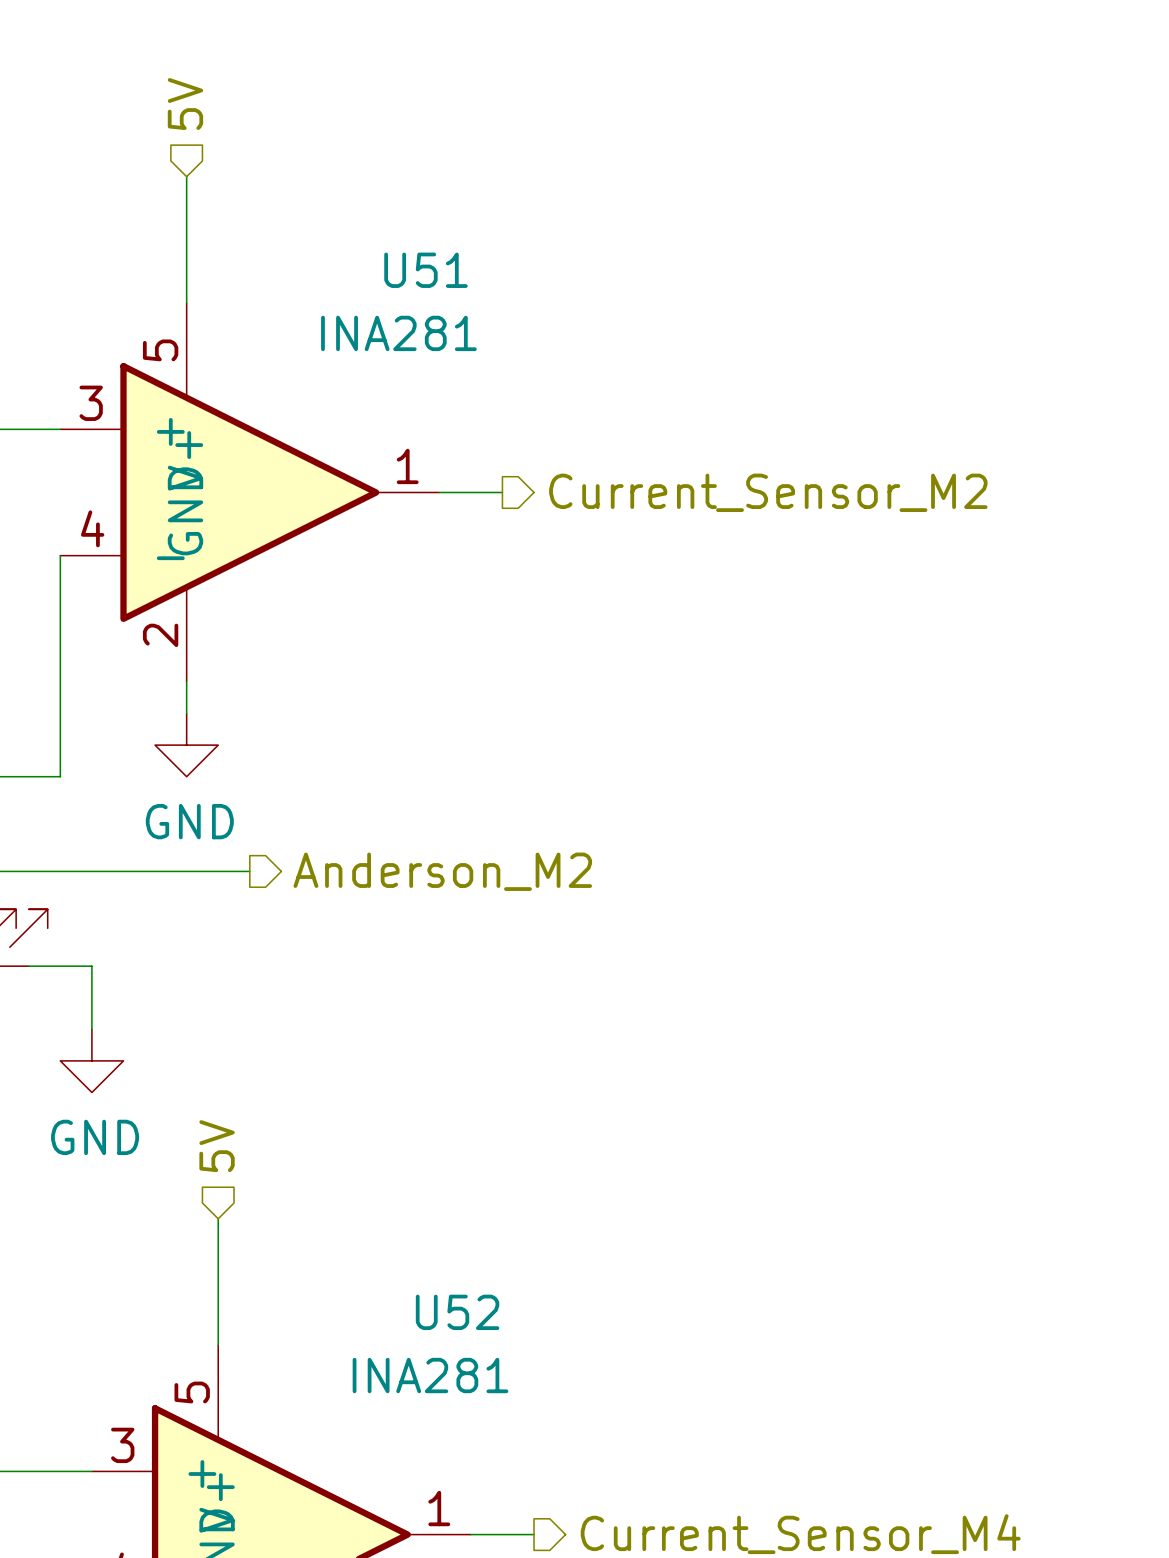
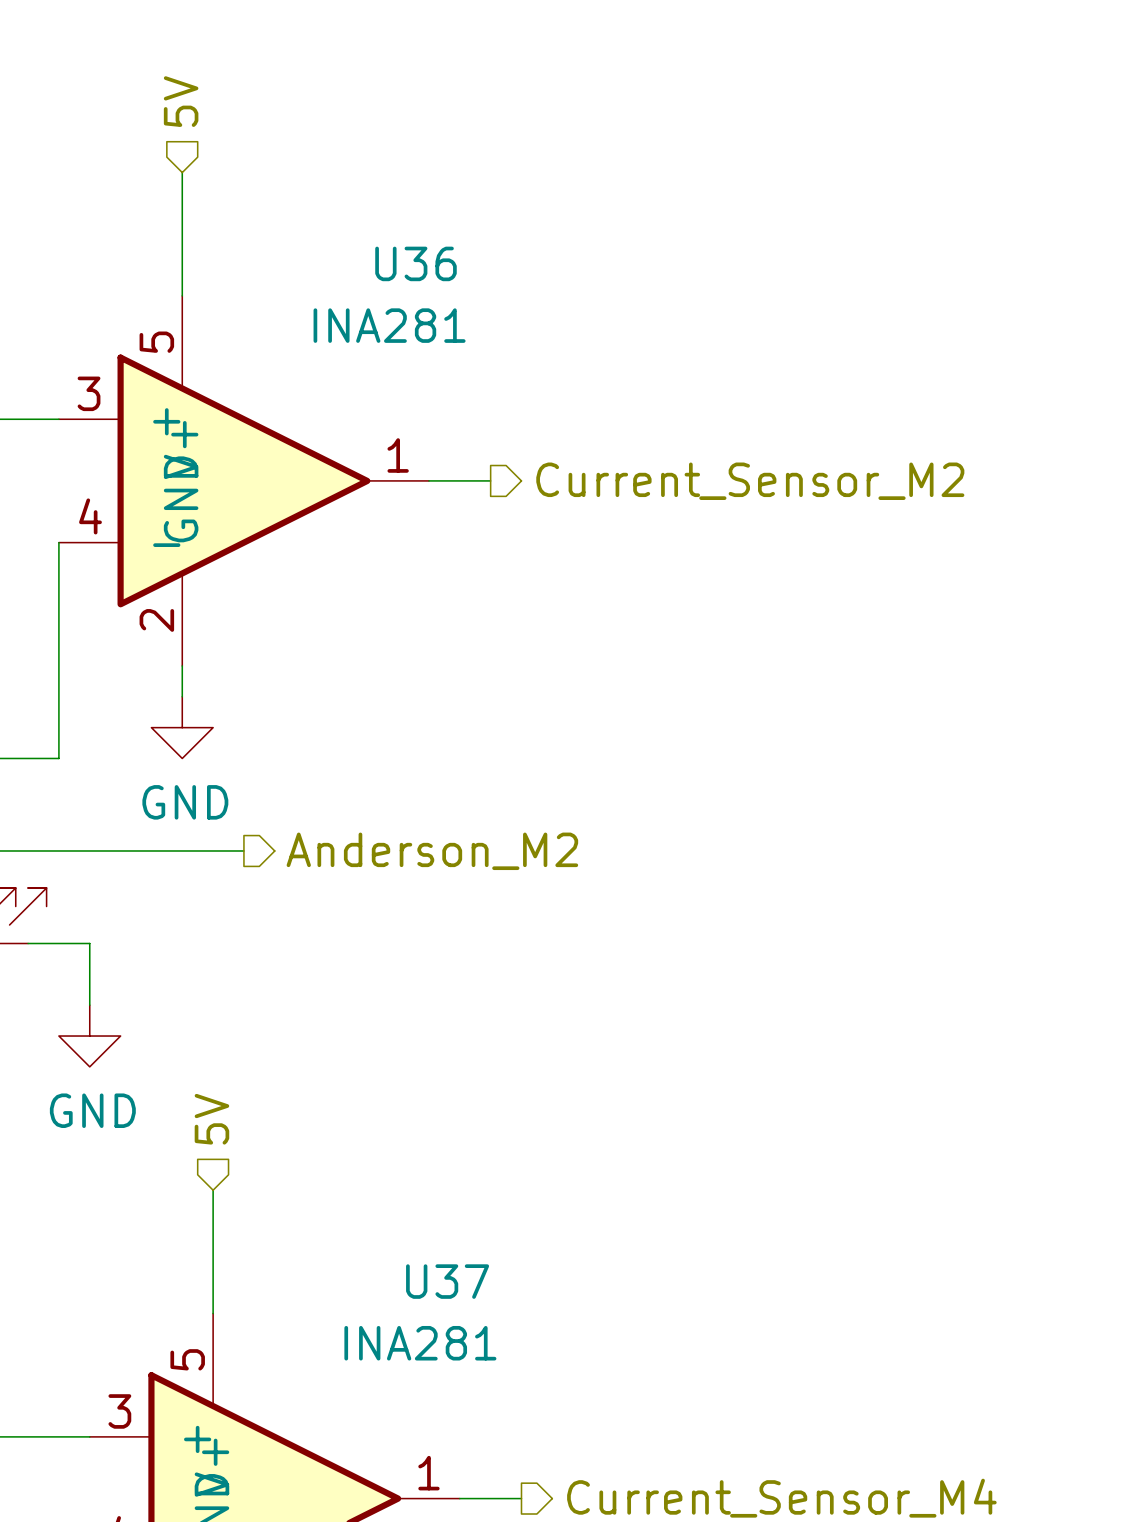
U51 name: U51 (425, 270) -> U36 (415, 263)
U52 name: U52 (457, 1312) -> U37 (447, 1281)

